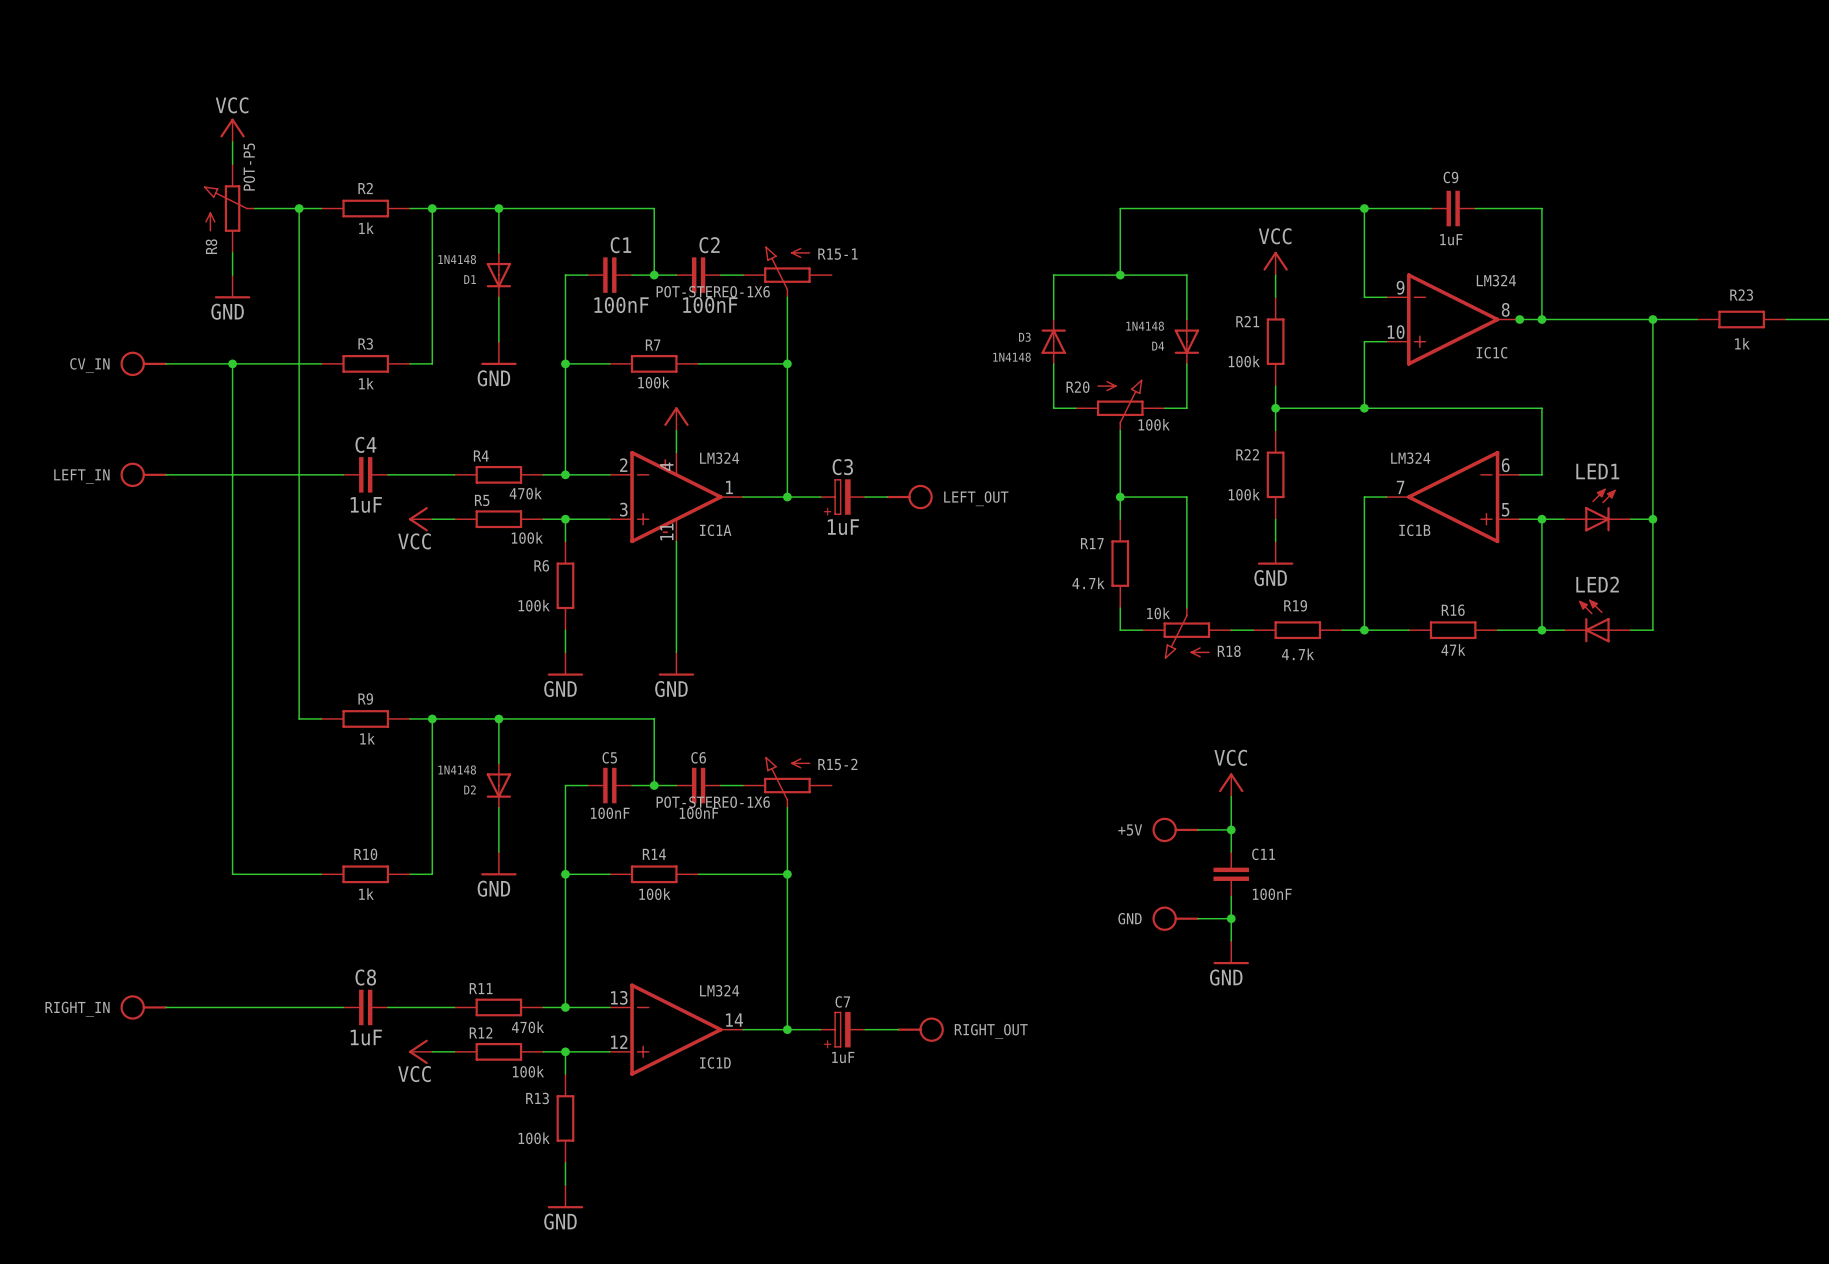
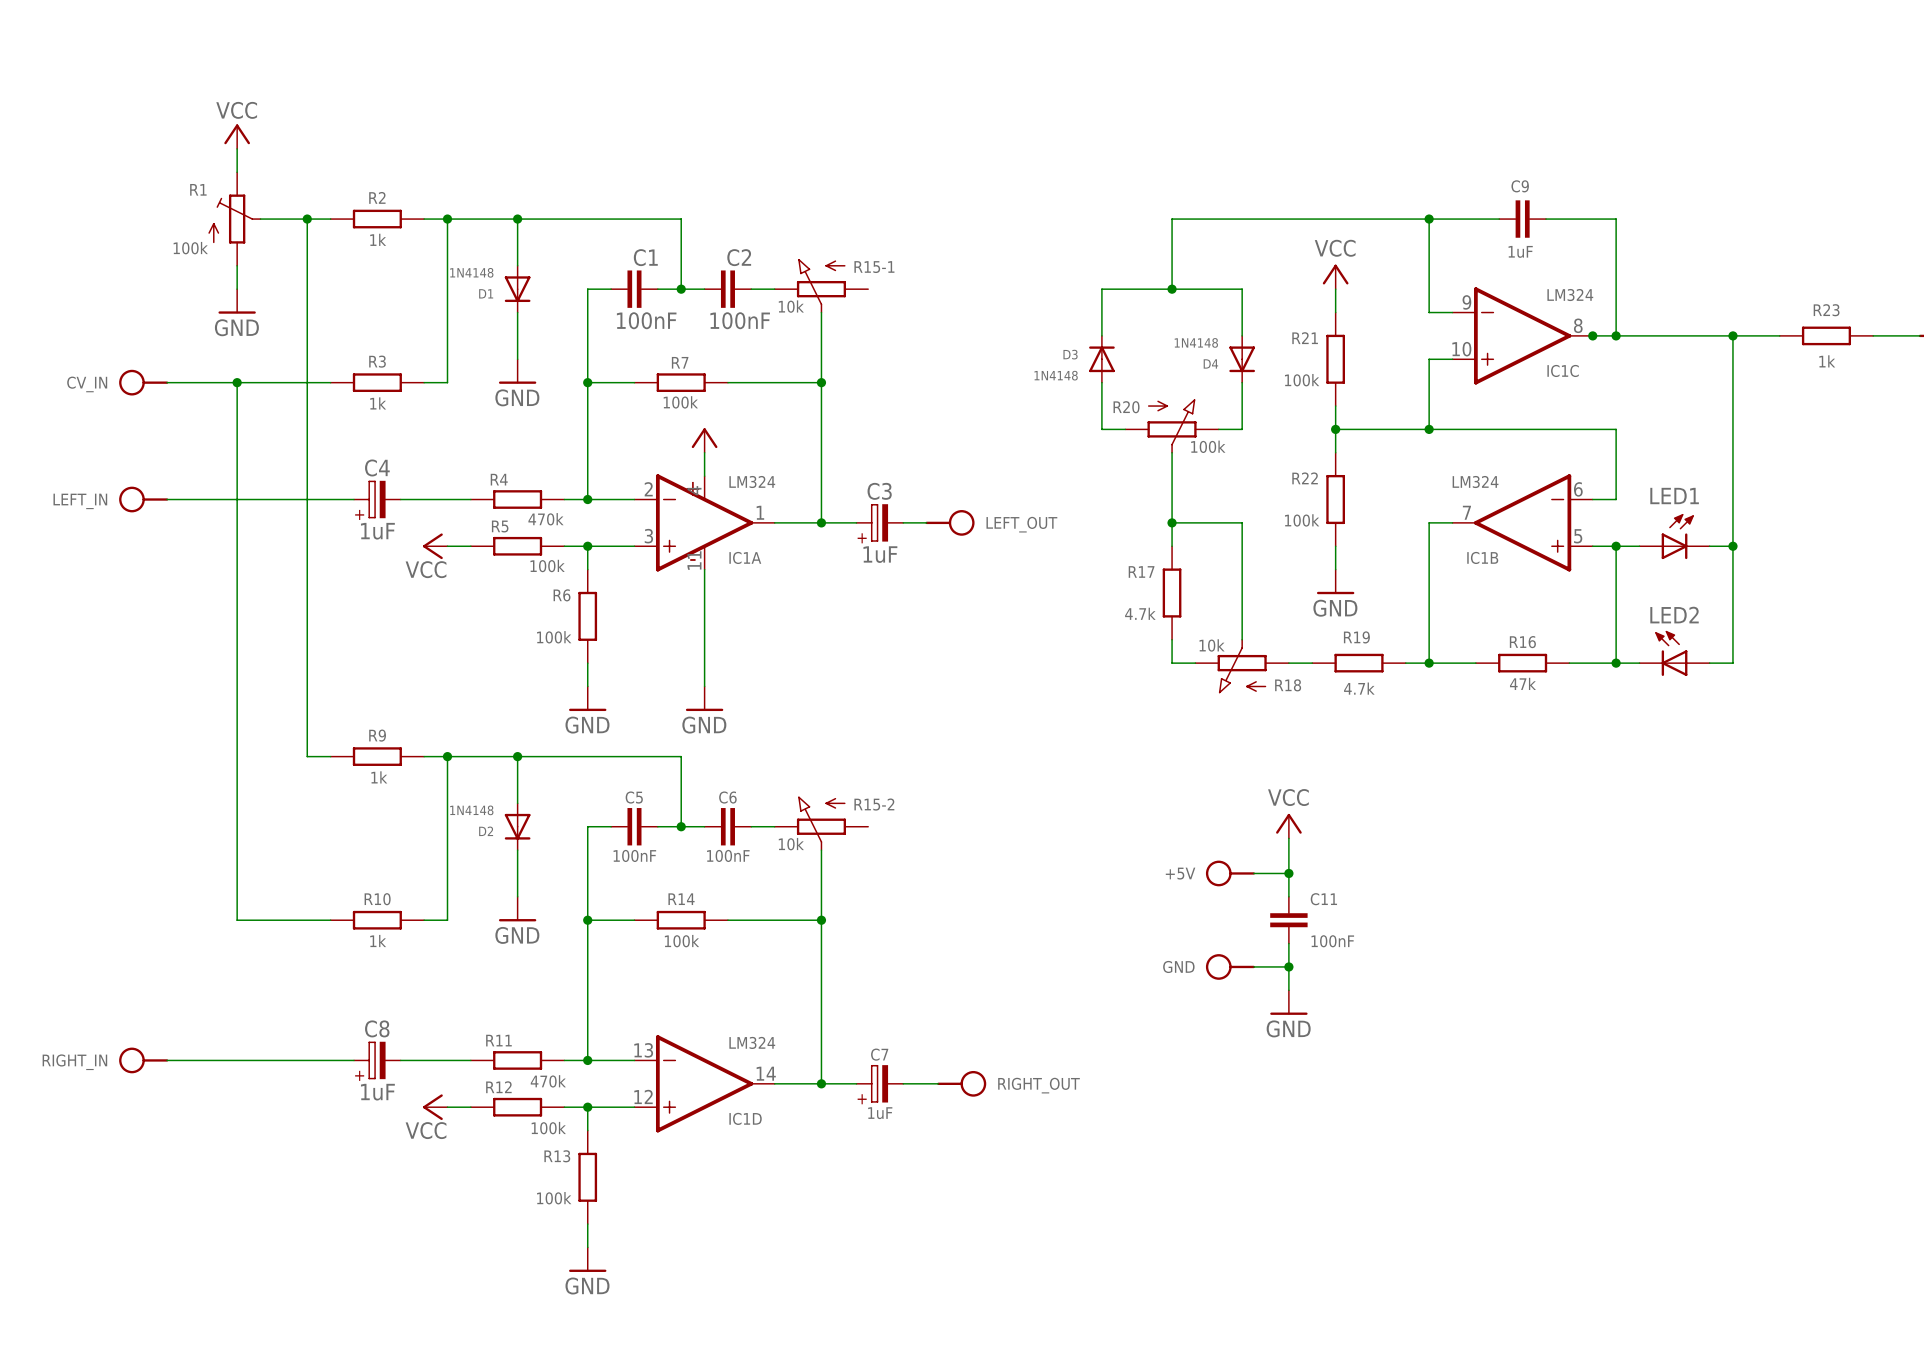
R8: POT-P5 (229, 208) -> none
R1: none -> 100k (234, 219)
R15-1 value: POT-STEREO-1X6 (713, 291) -> 10k (791, 306)
C4 symbol: [342, 457, 389, 493] -> [353, 480, 402, 519]
R15-2 value: POT-STEREO-1X6 (713, 802) -> 10k (791, 844)
C8 symbol: [342, 989, 389, 1026] -> [353, 1041, 402, 1080]

